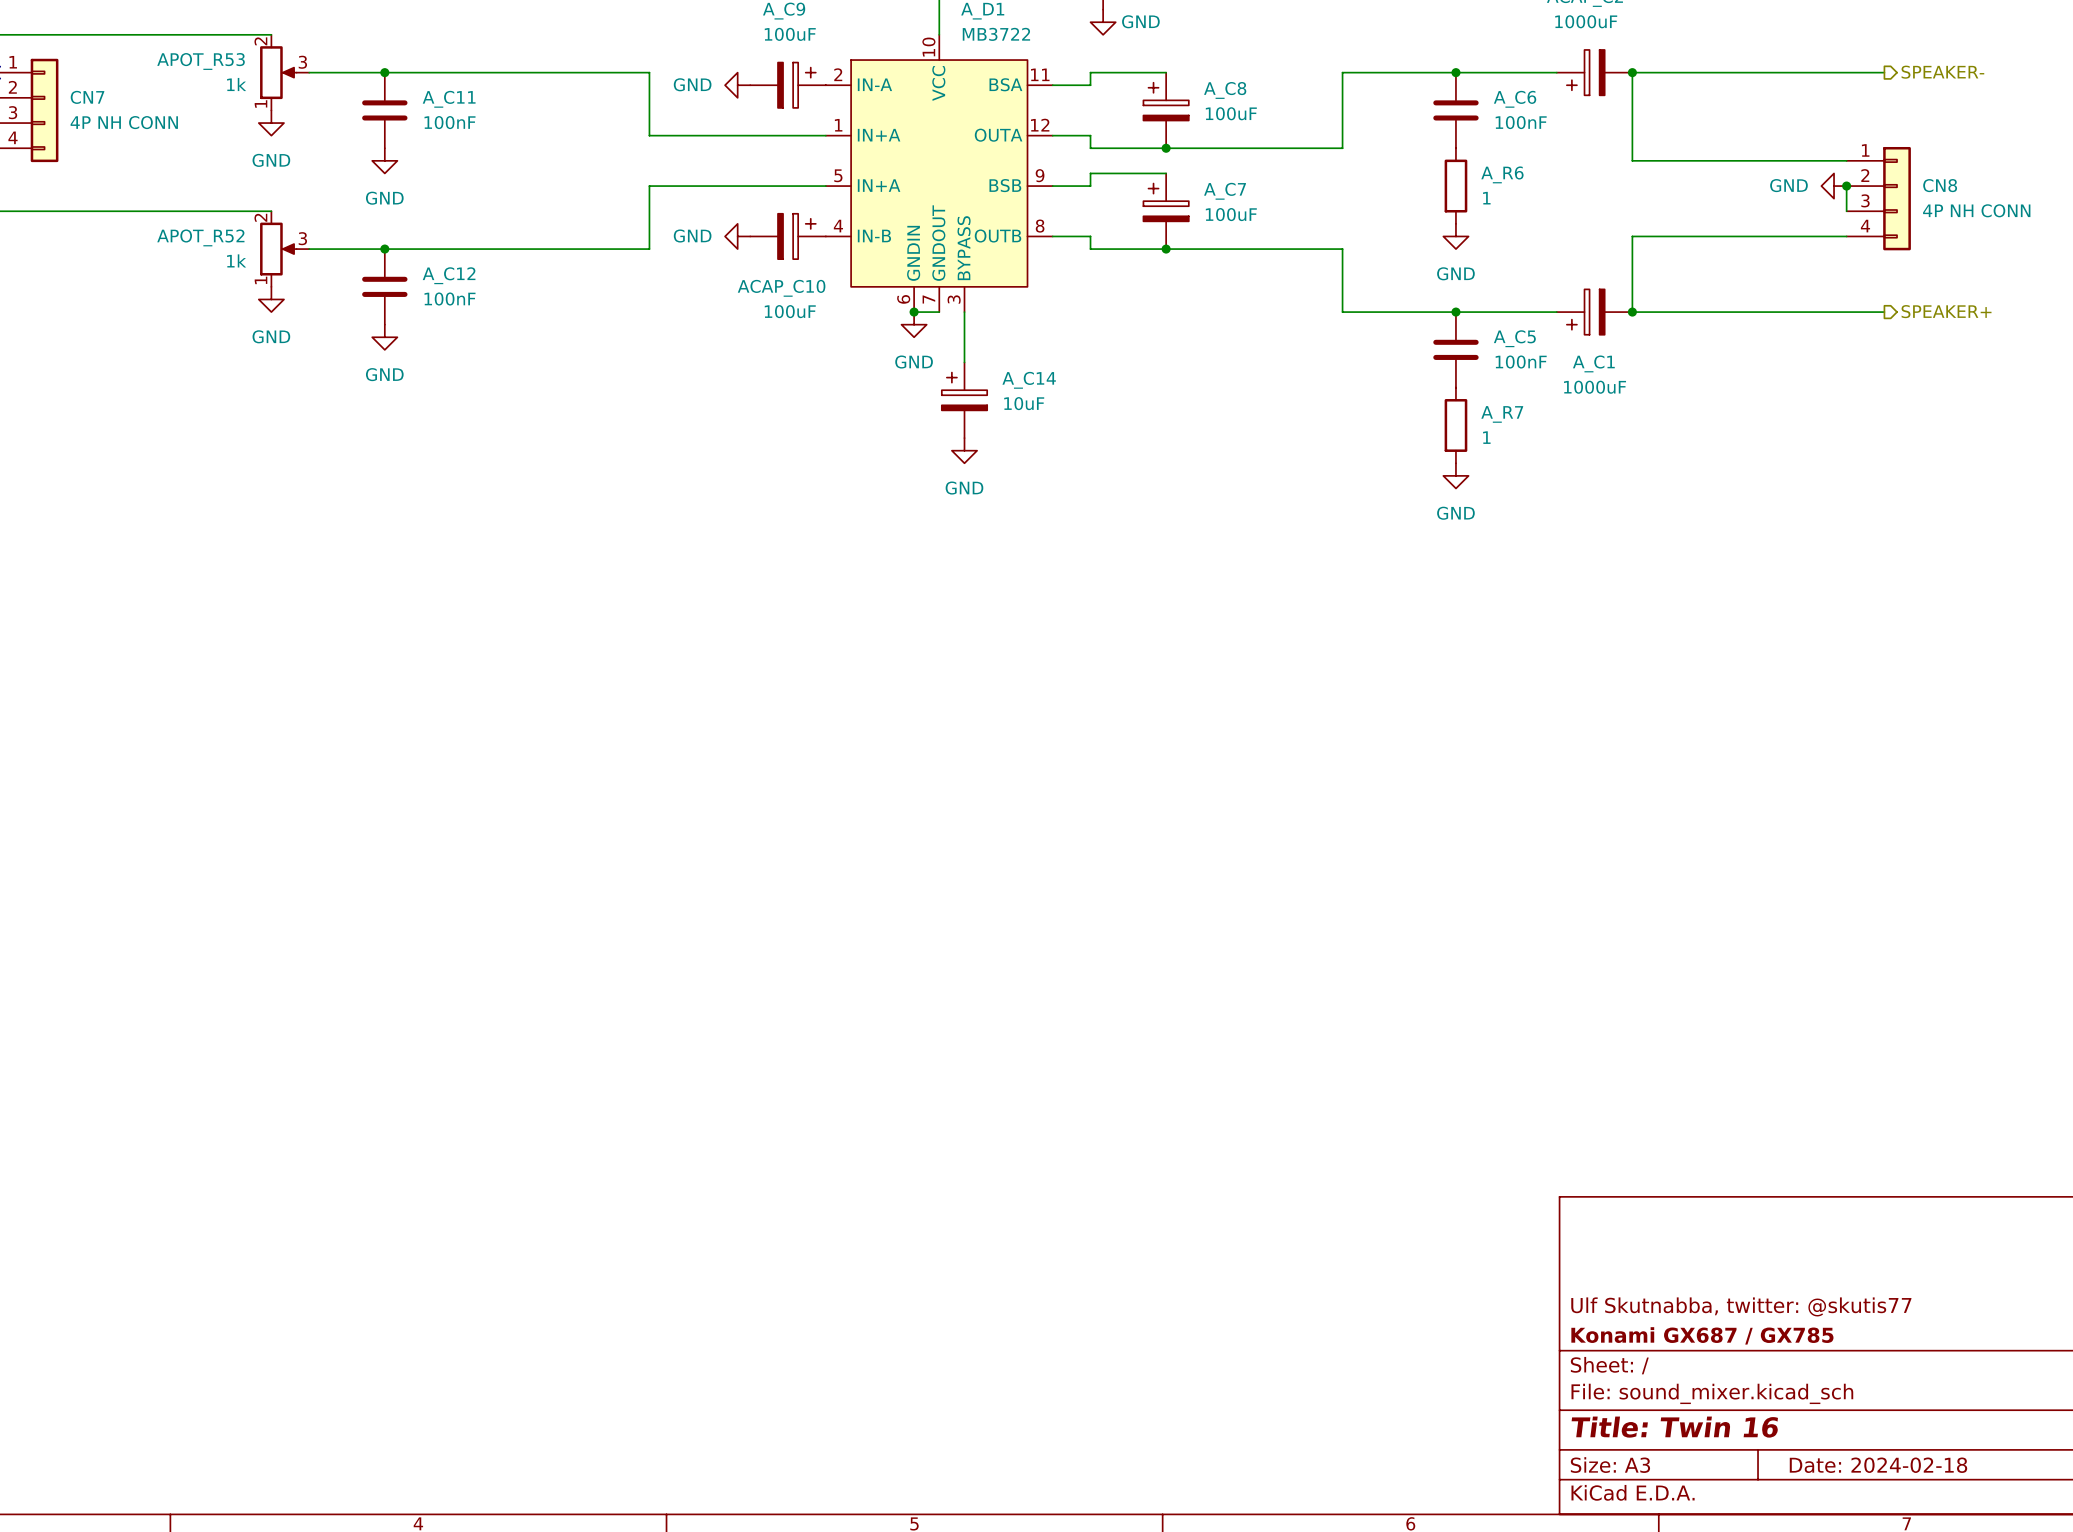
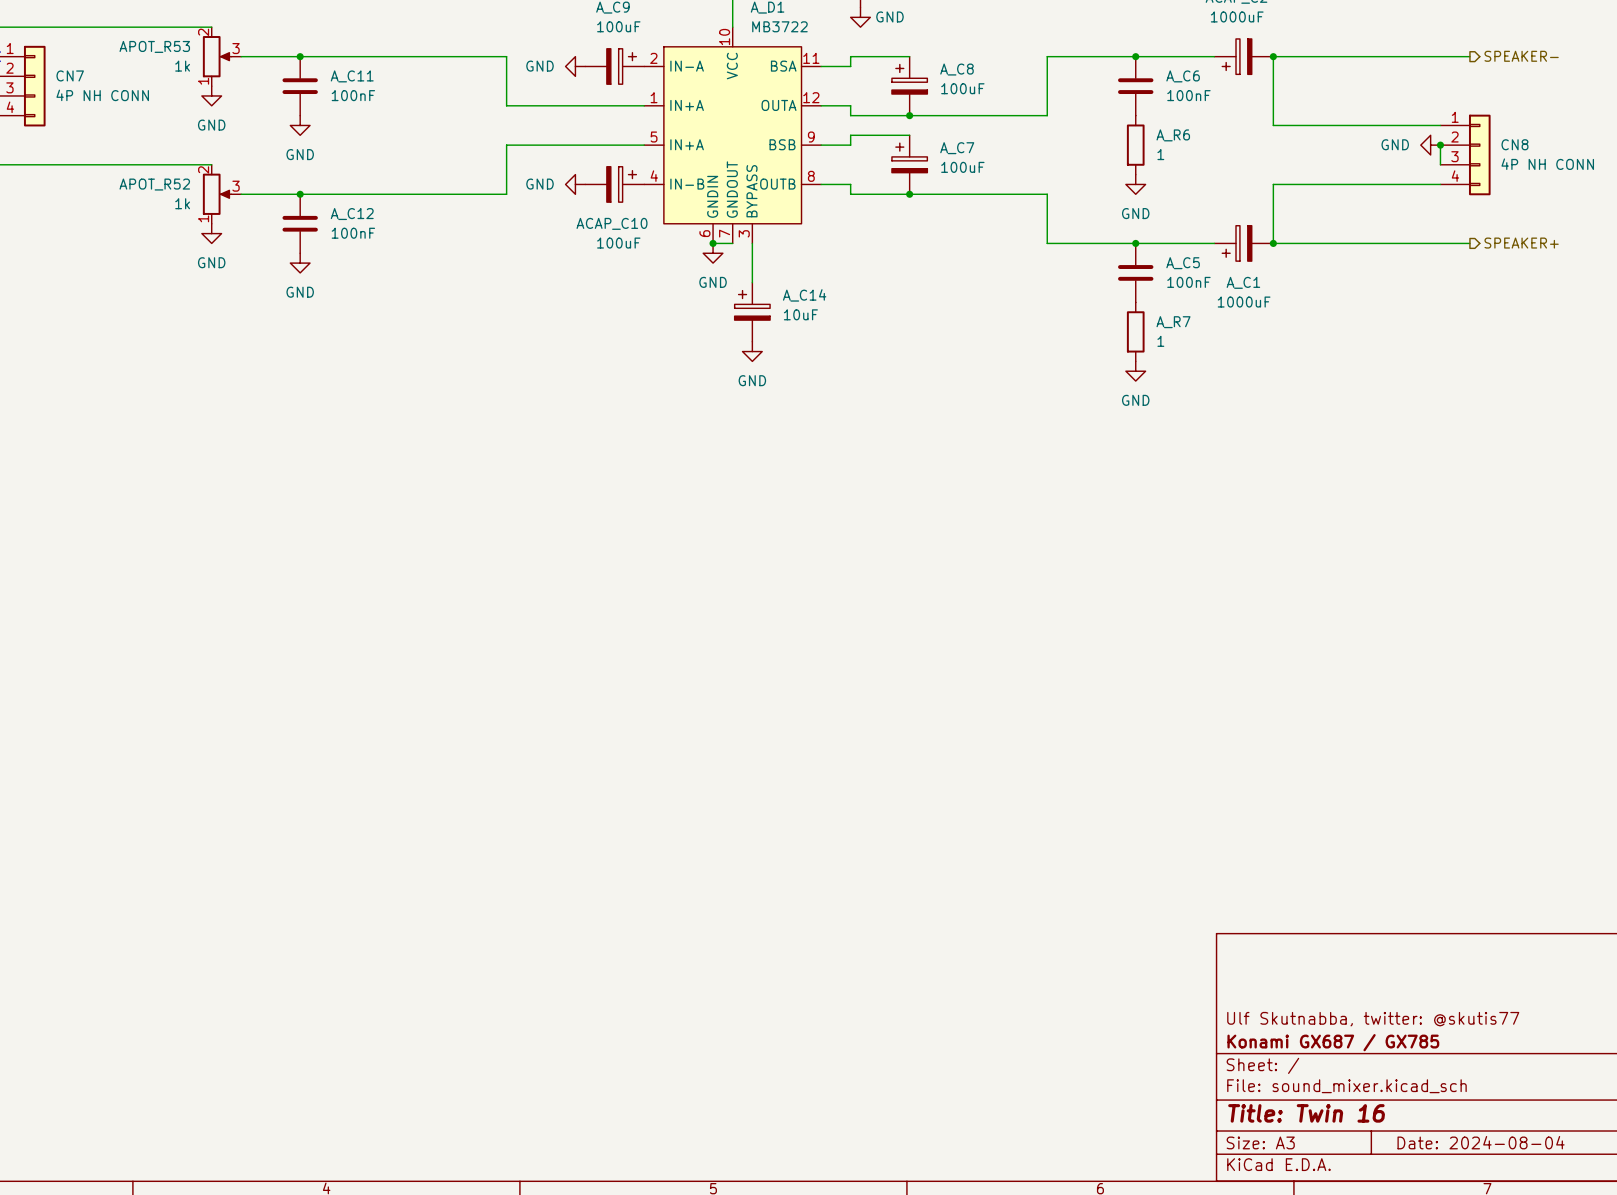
title block: Date: 2024-02-18 (1878, 1465) -> Date: 2024-08-04 (1481, 1142)

